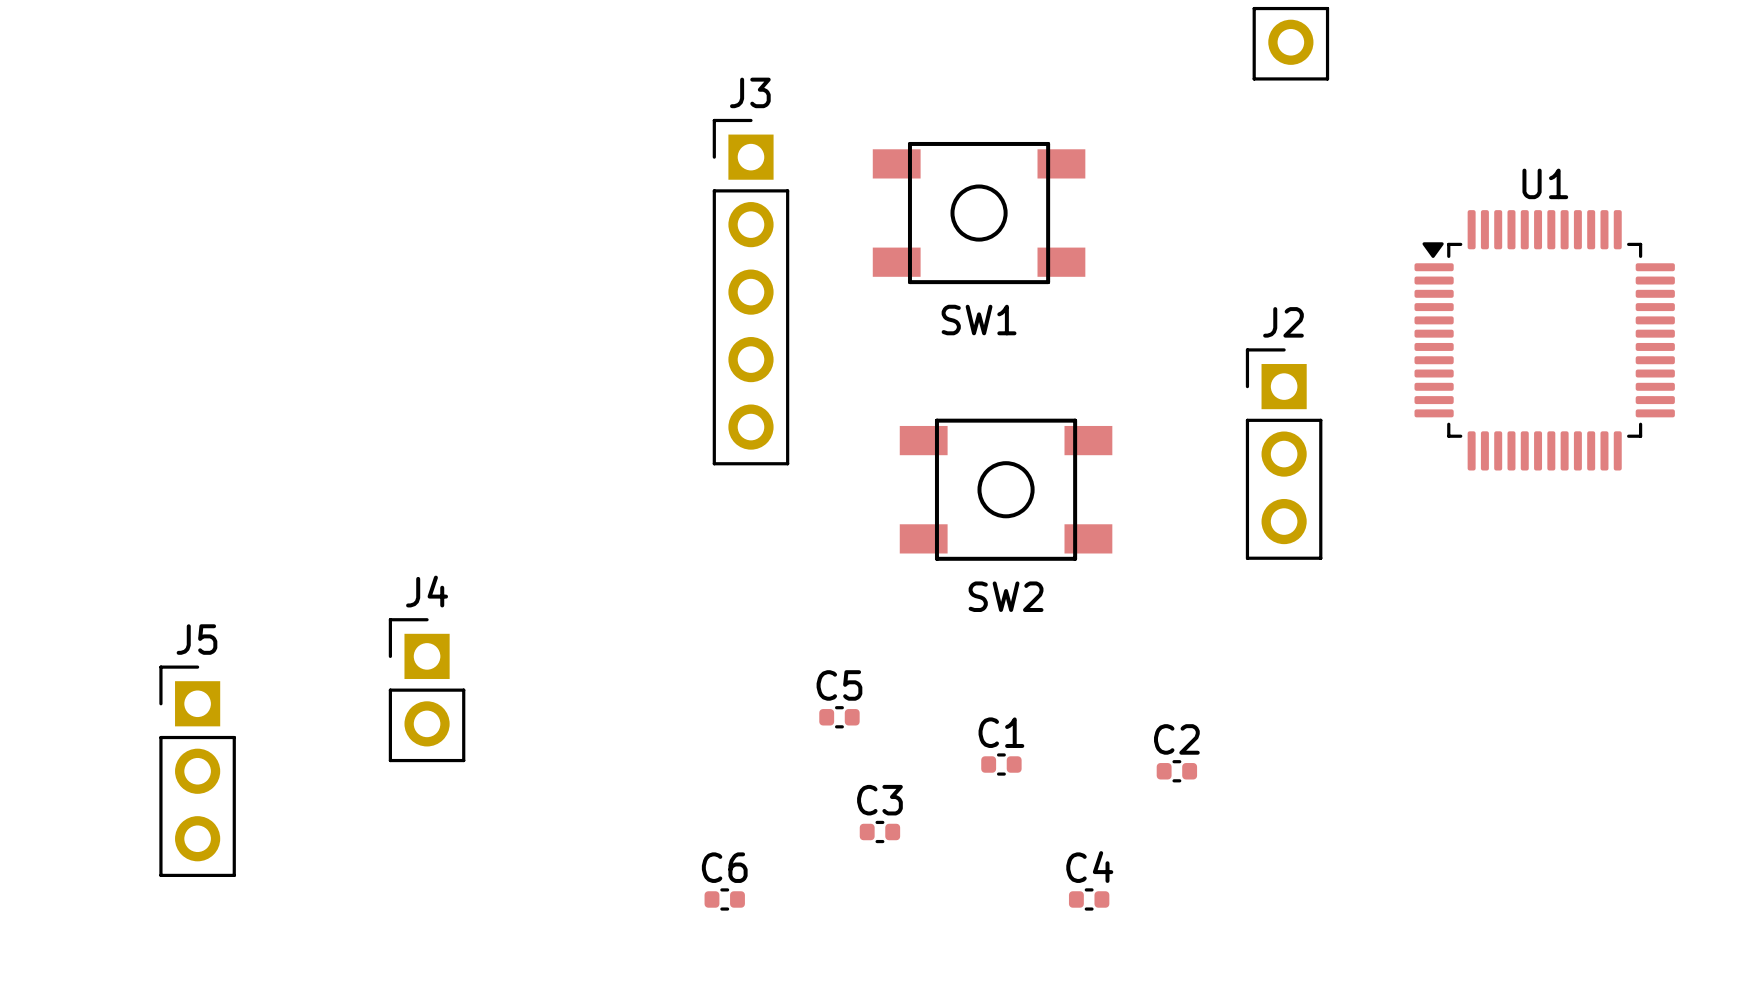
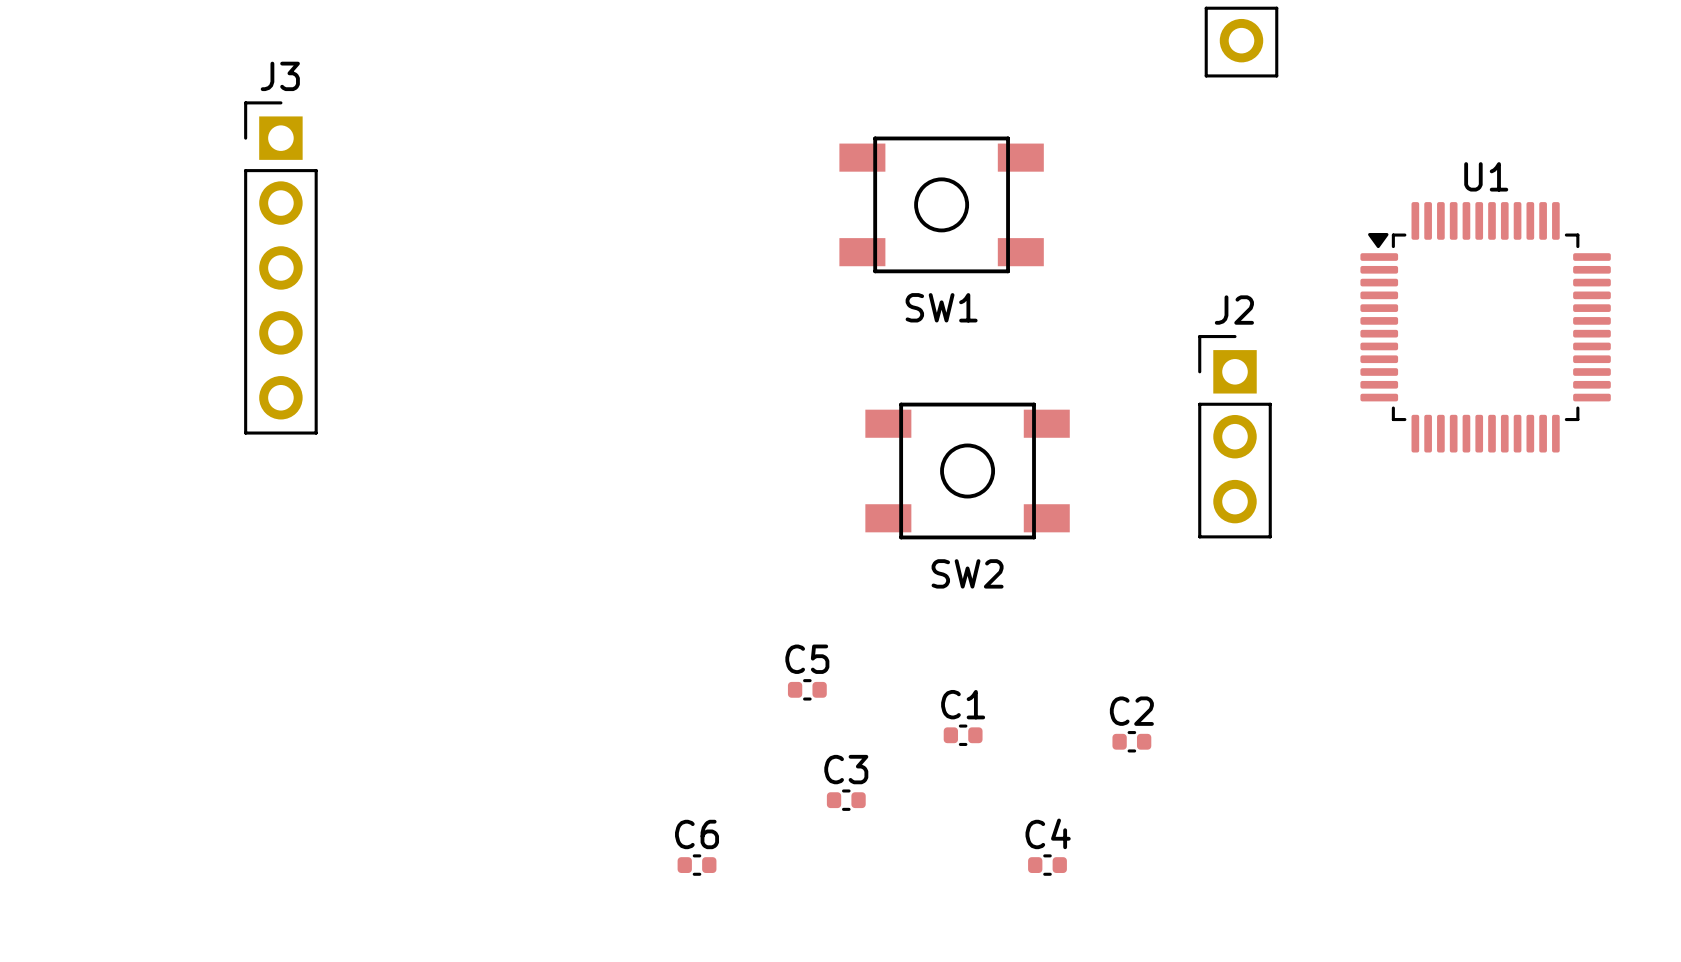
J3 position: (750, 292) -> (280, 267)
J4: (427, 690) -> none
J5: (197, 771) -> none

